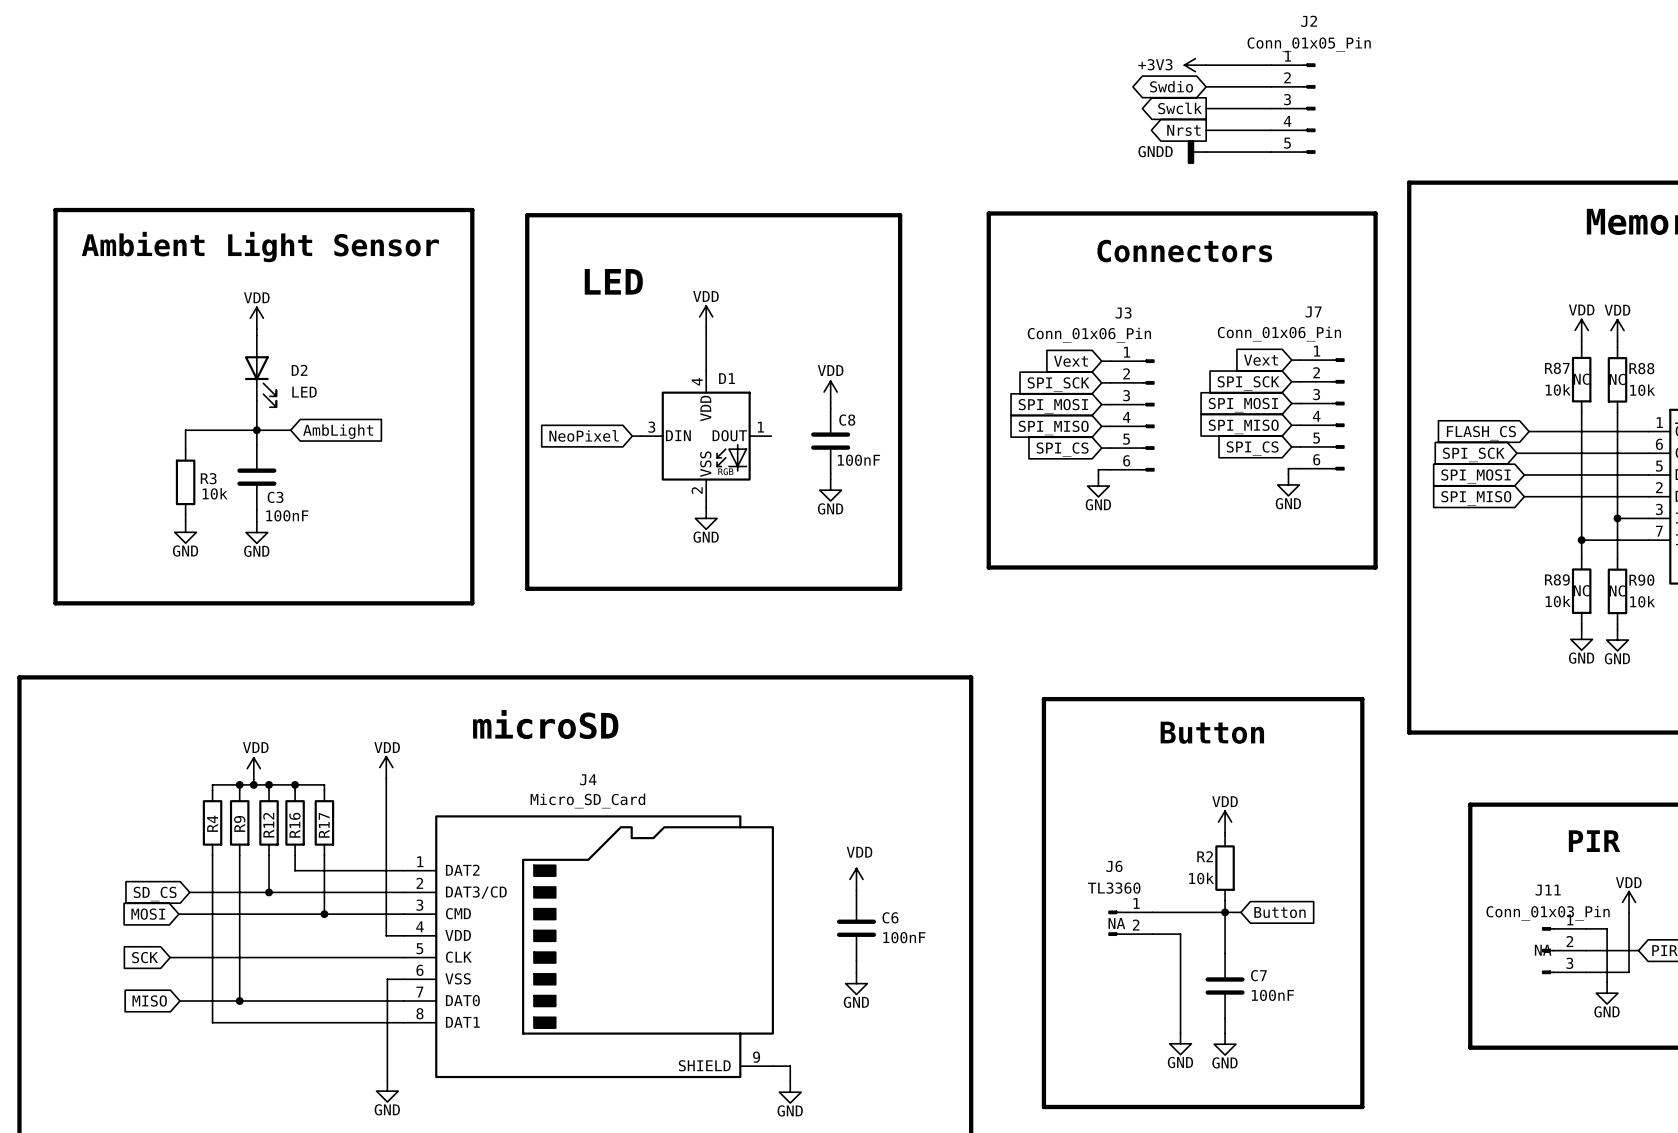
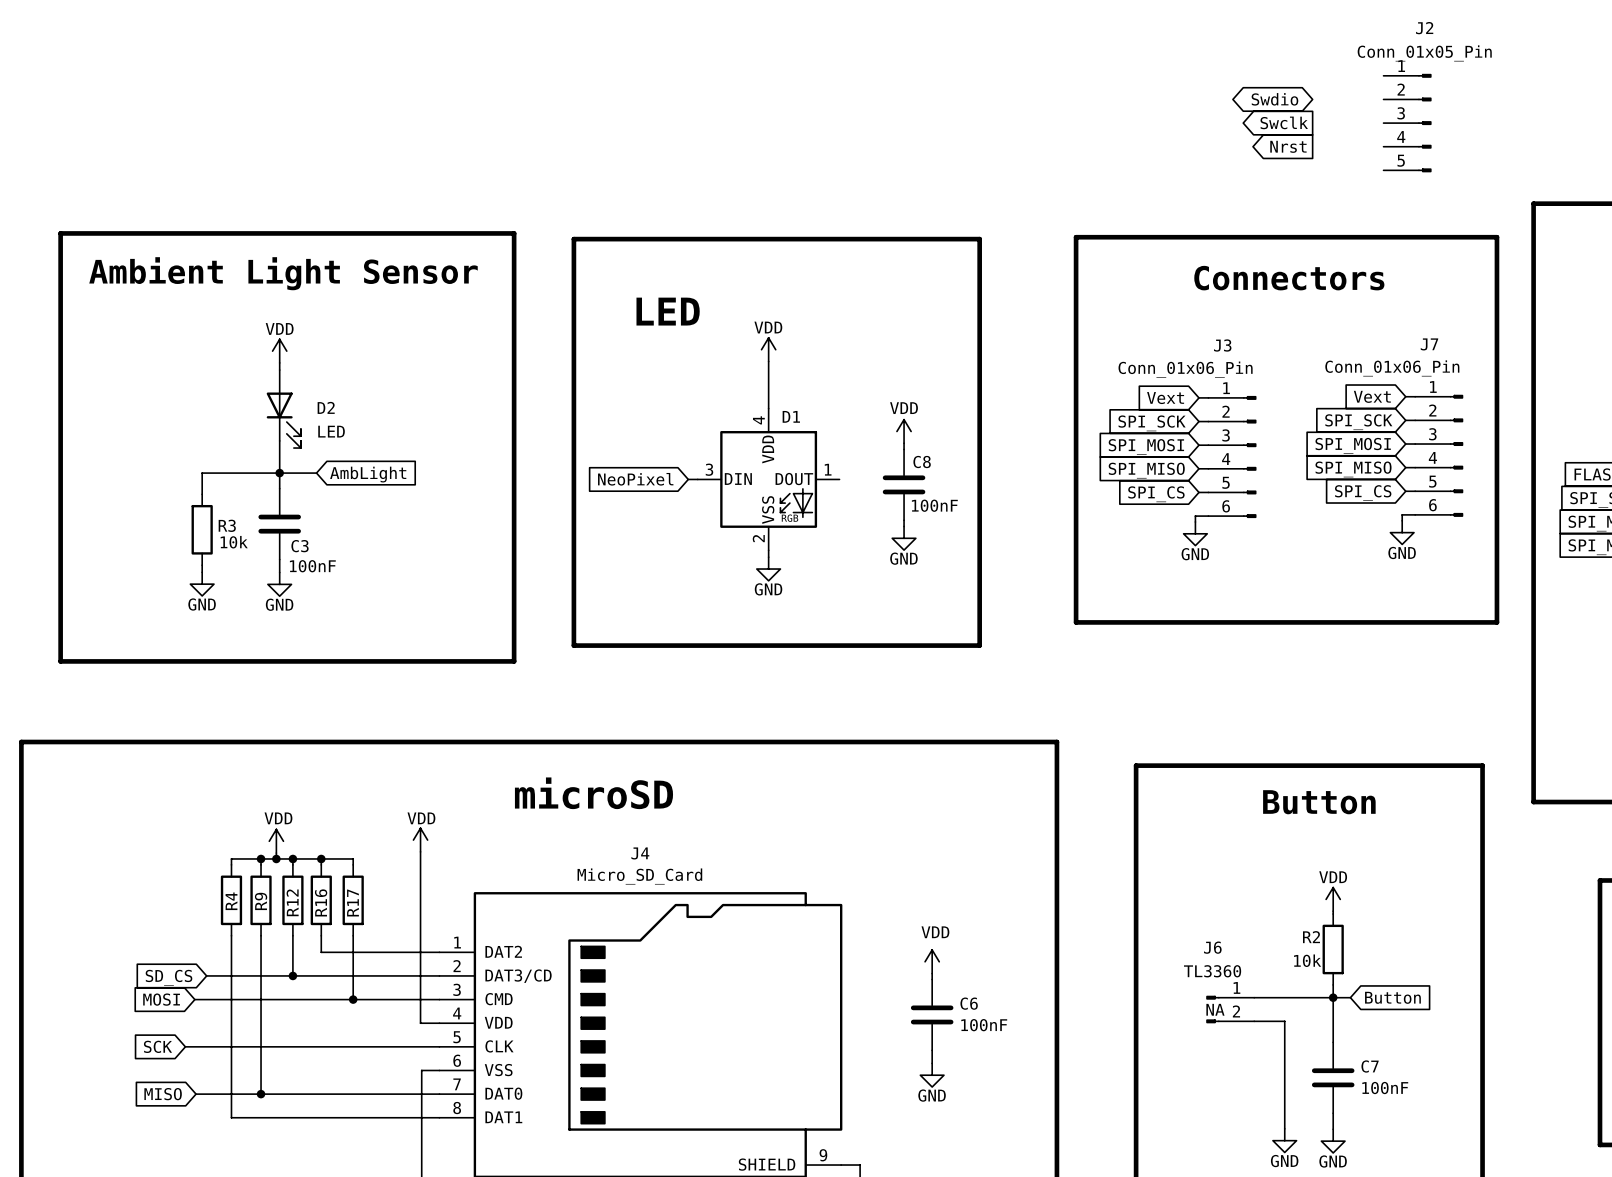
power symbol: +3V3 (1195, 65) -> none
wire: (1206, 65) (1271, 65) -> none
wire: (1206, 86) (1271, 86) -> none
wire: (1206, 108) (1271, 108) -> none
wire: (1206, 130) (1271, 130) -> none
power symbol: GNDD (1196, 152) -> none
wire: (1206, 152) (1271, 152) -> none

